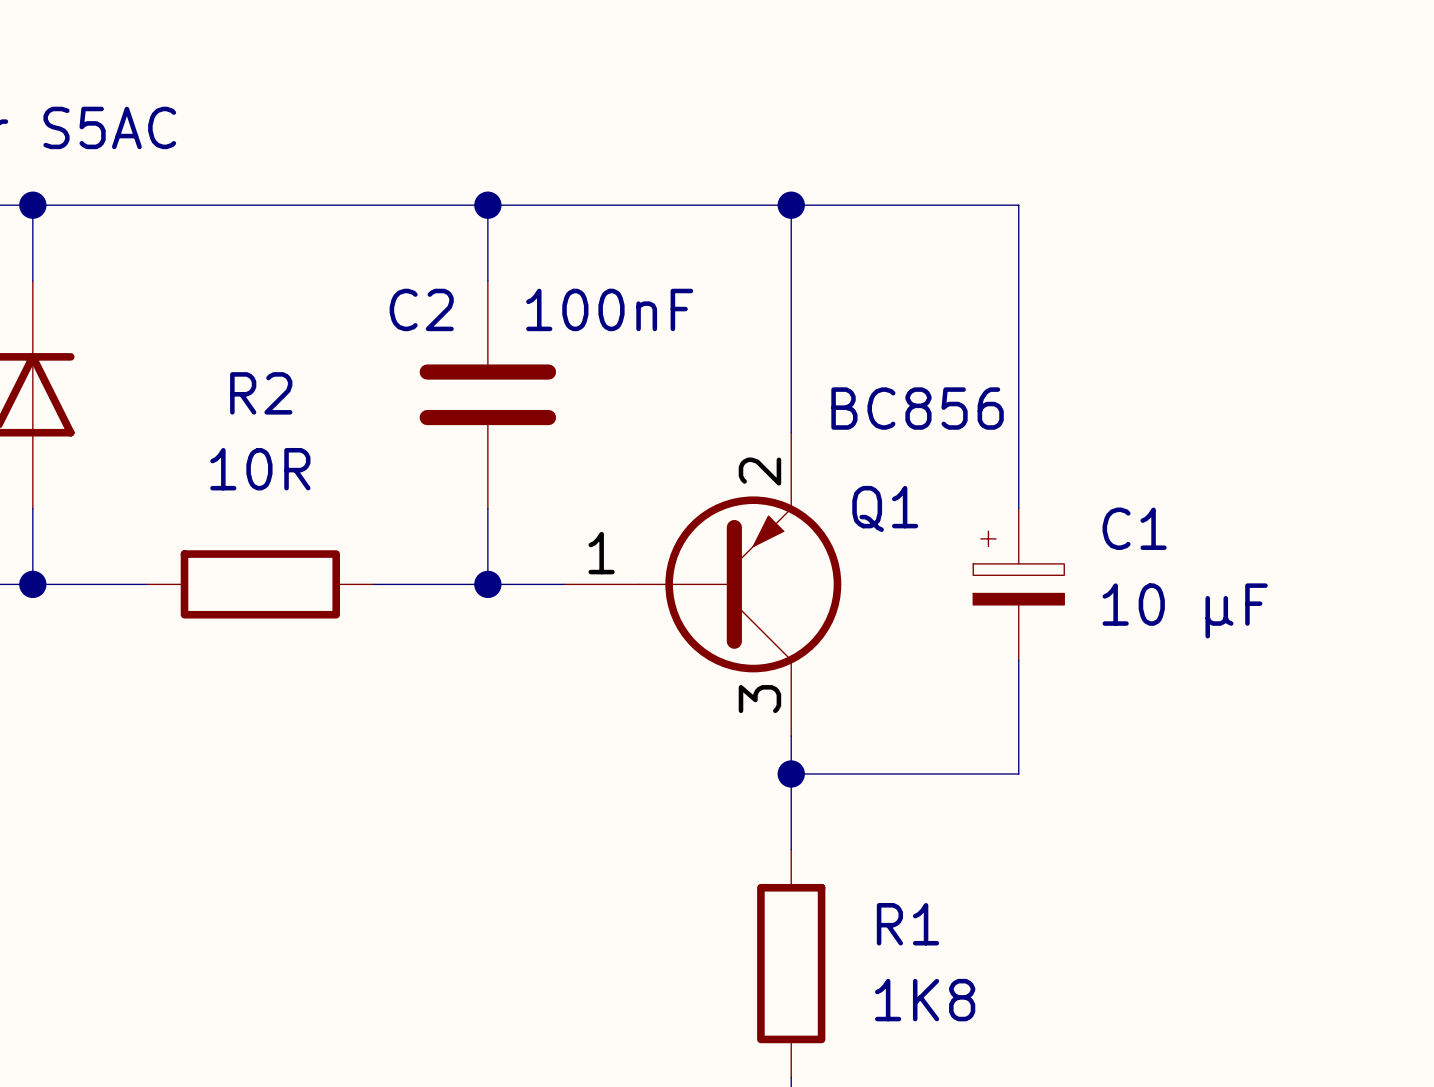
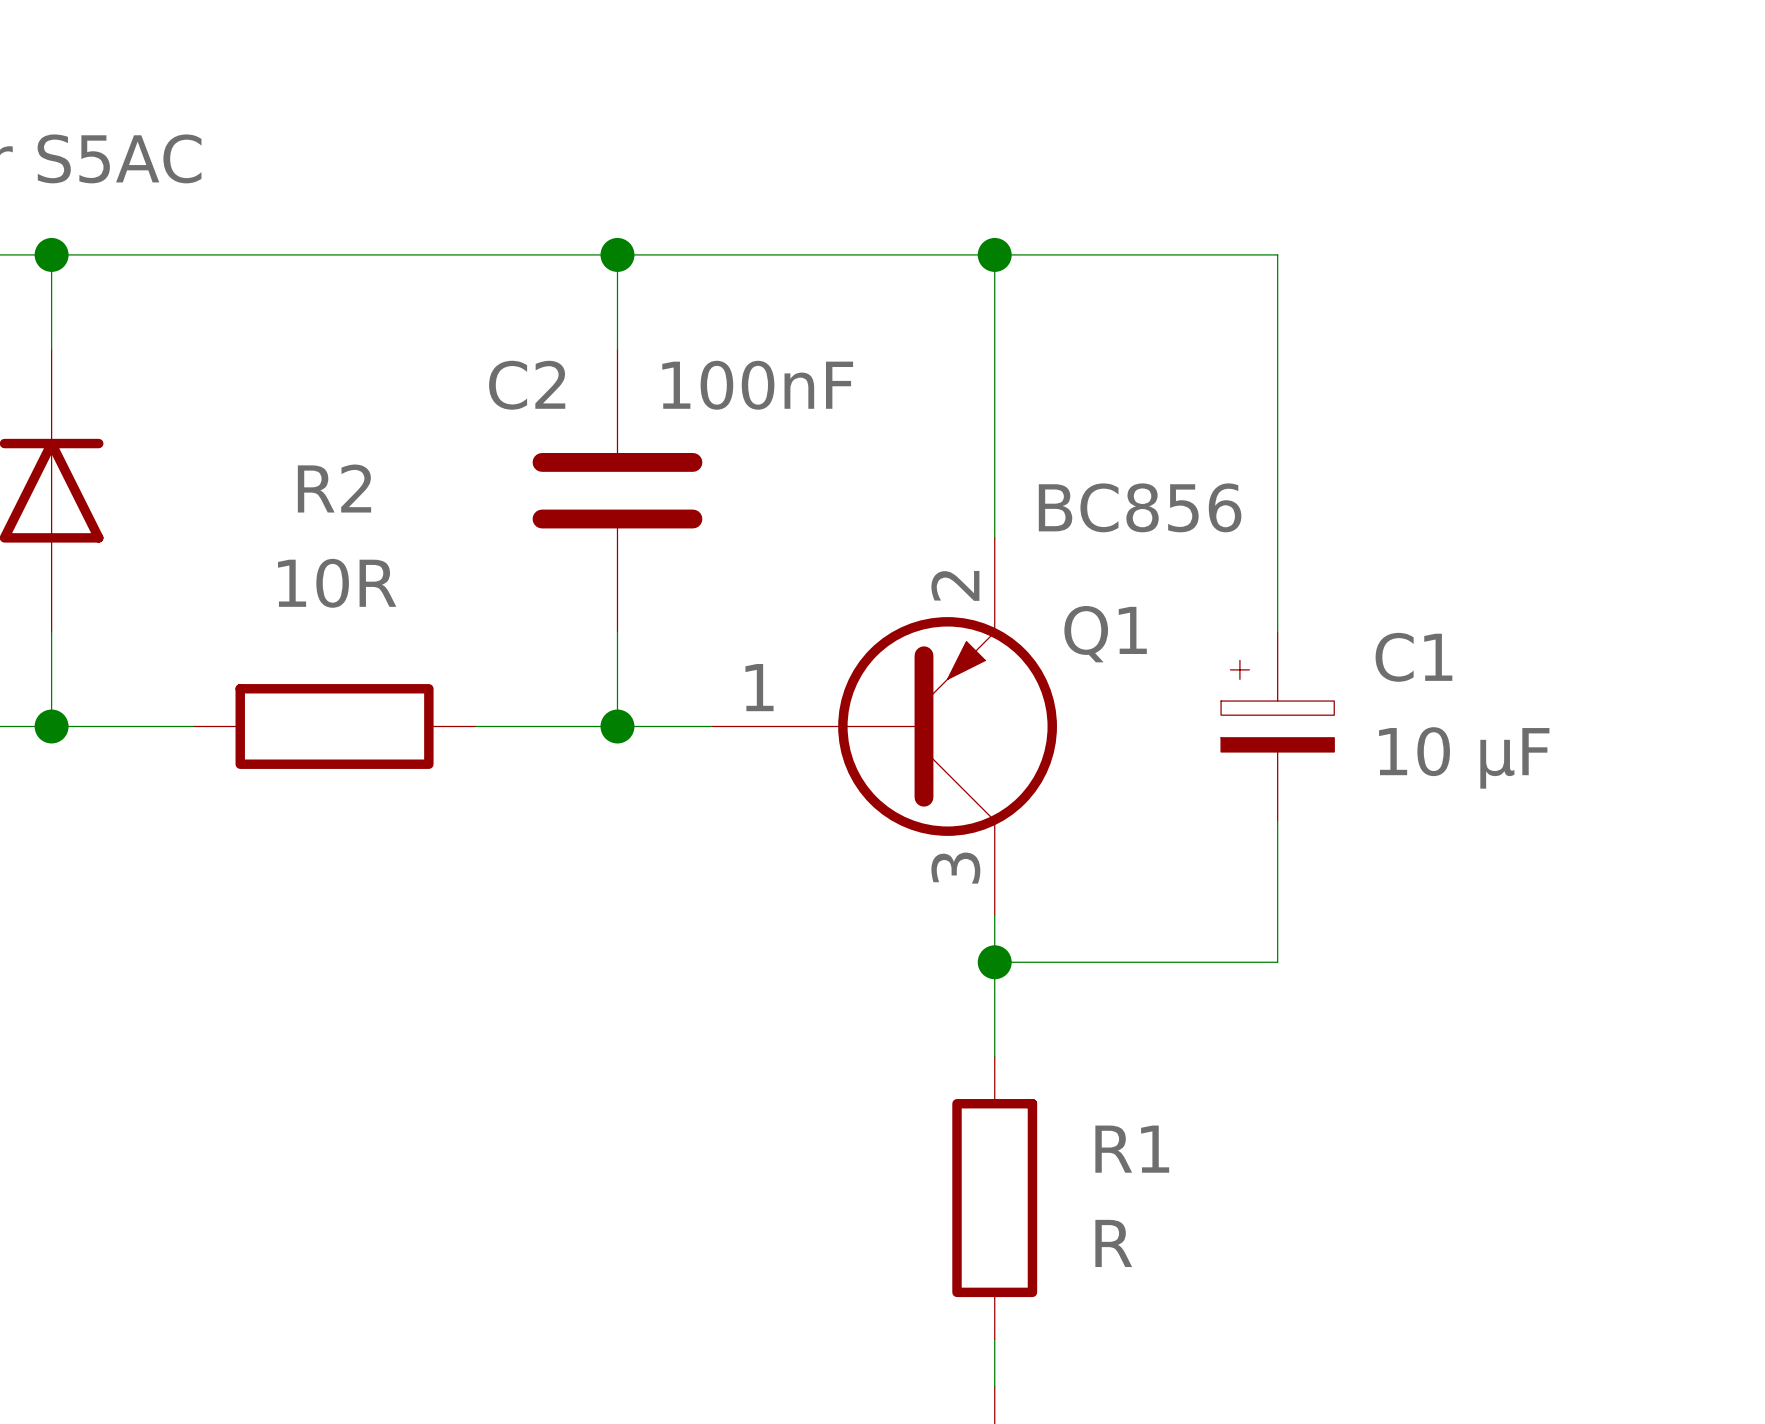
R1 value: 1K8 (925, 1000) -> R (1113, 1243)

